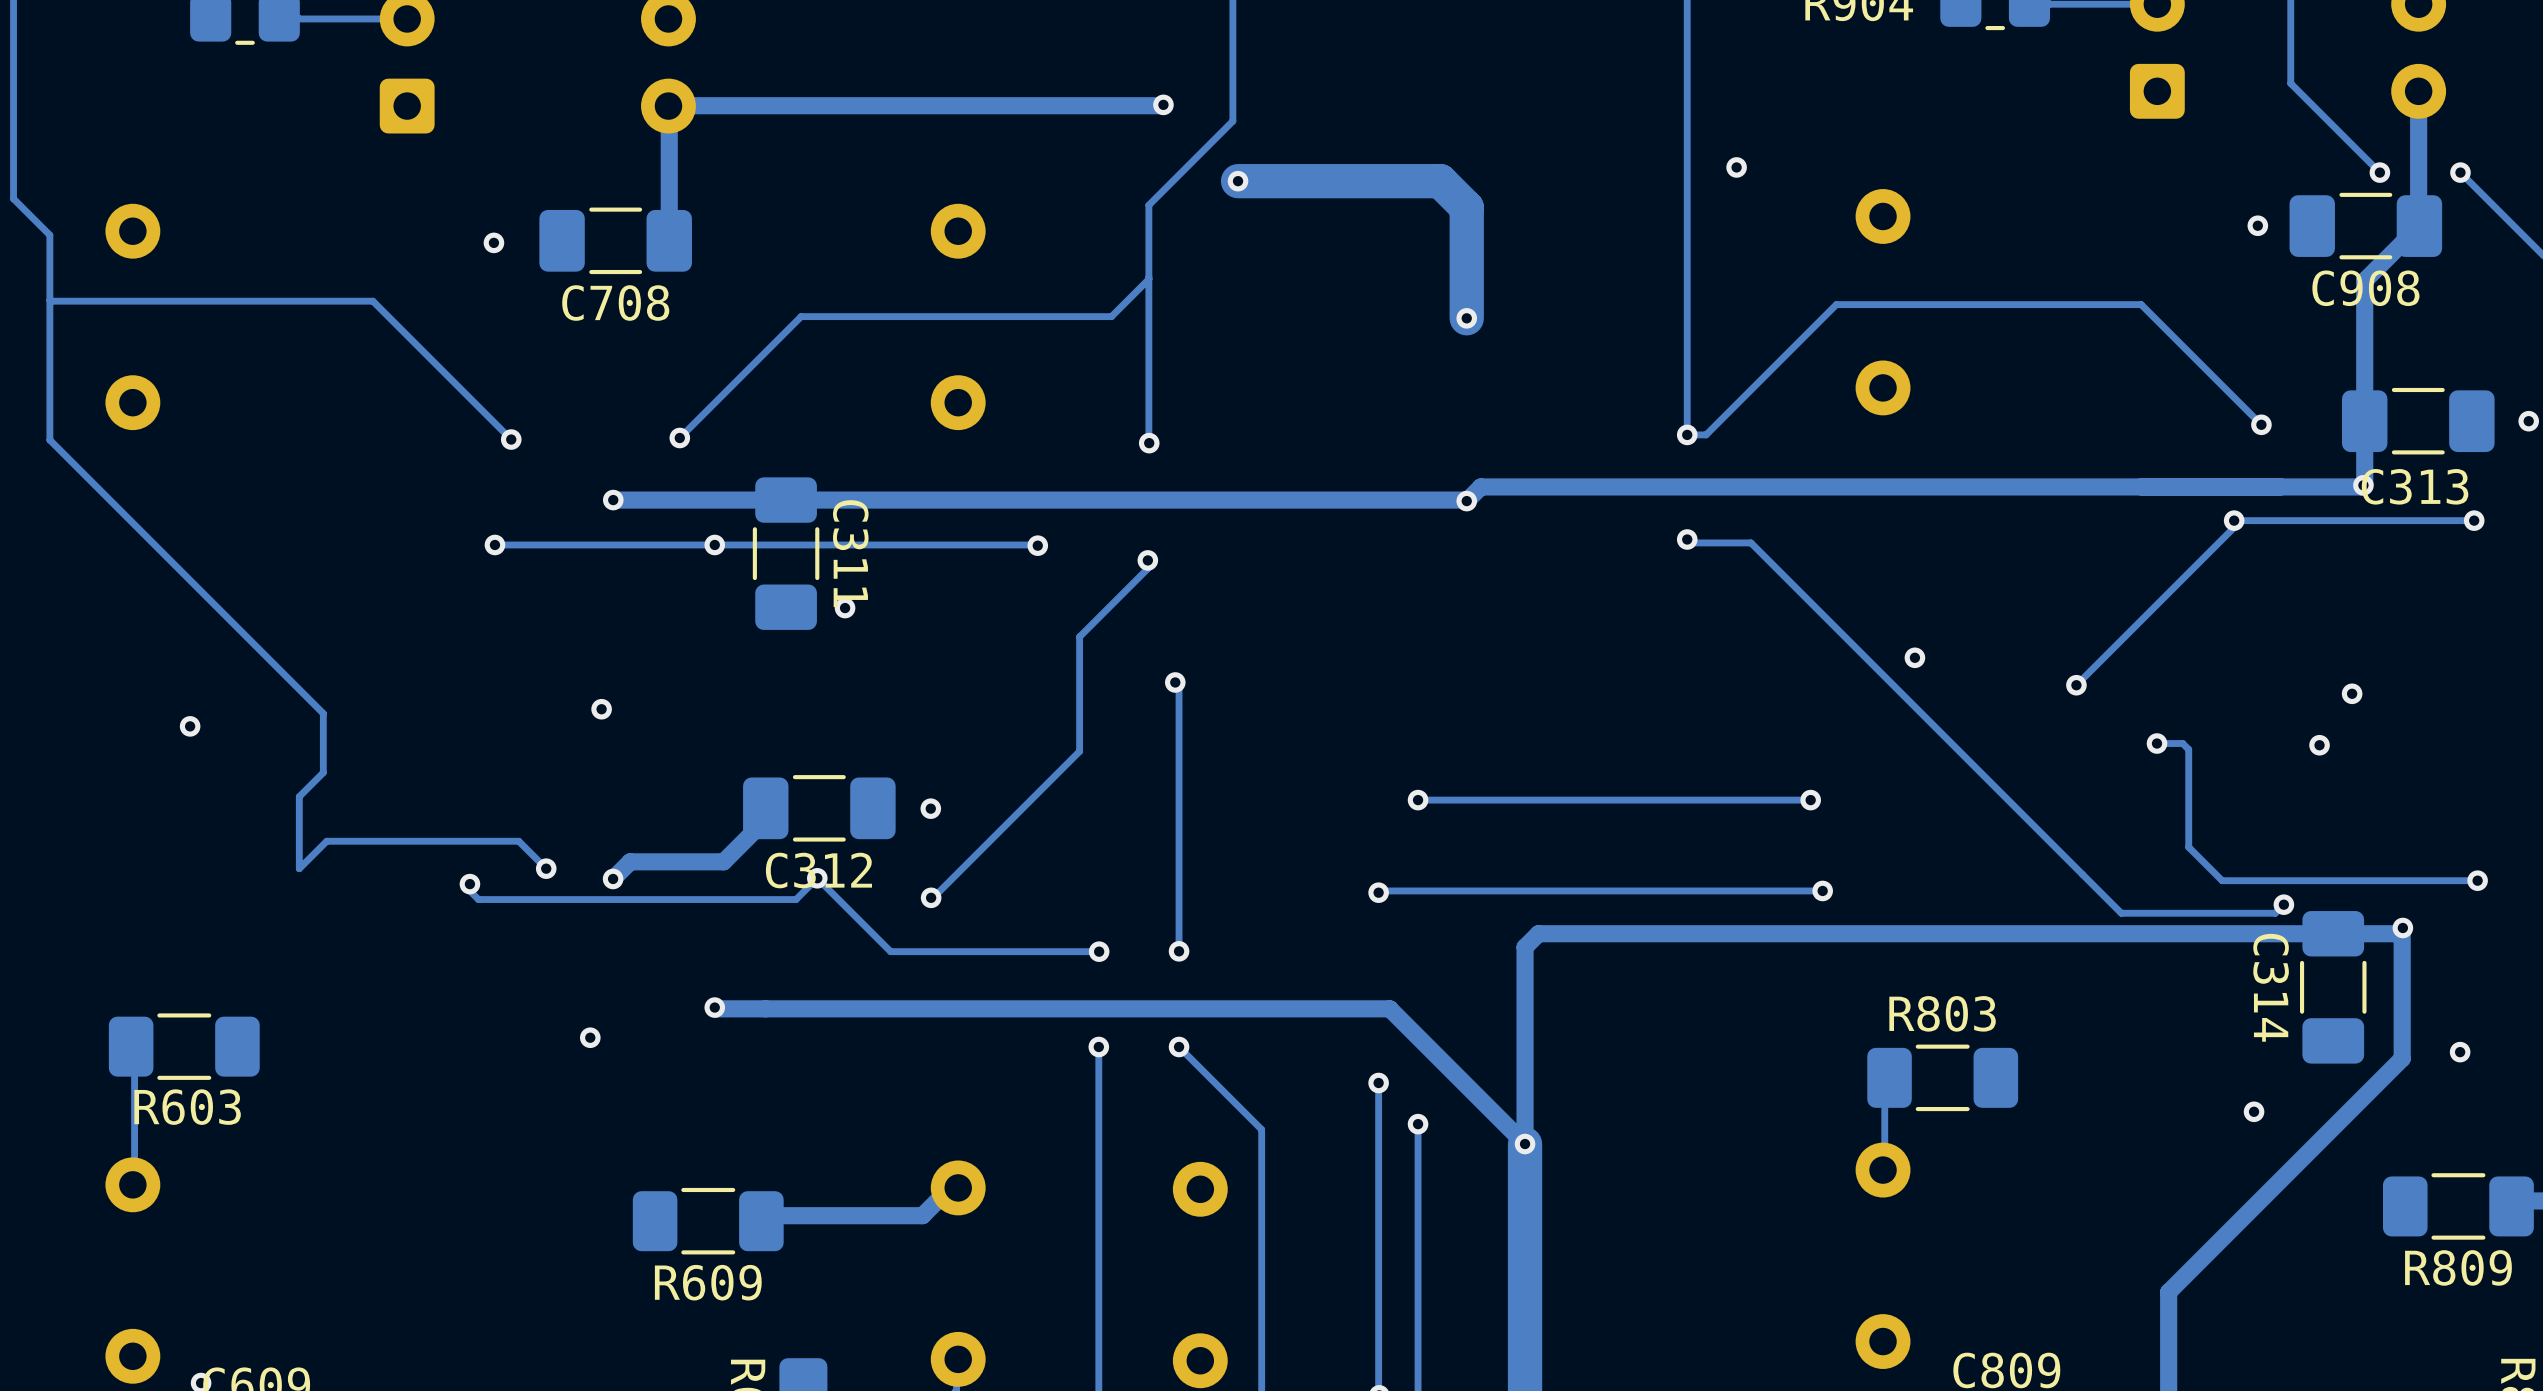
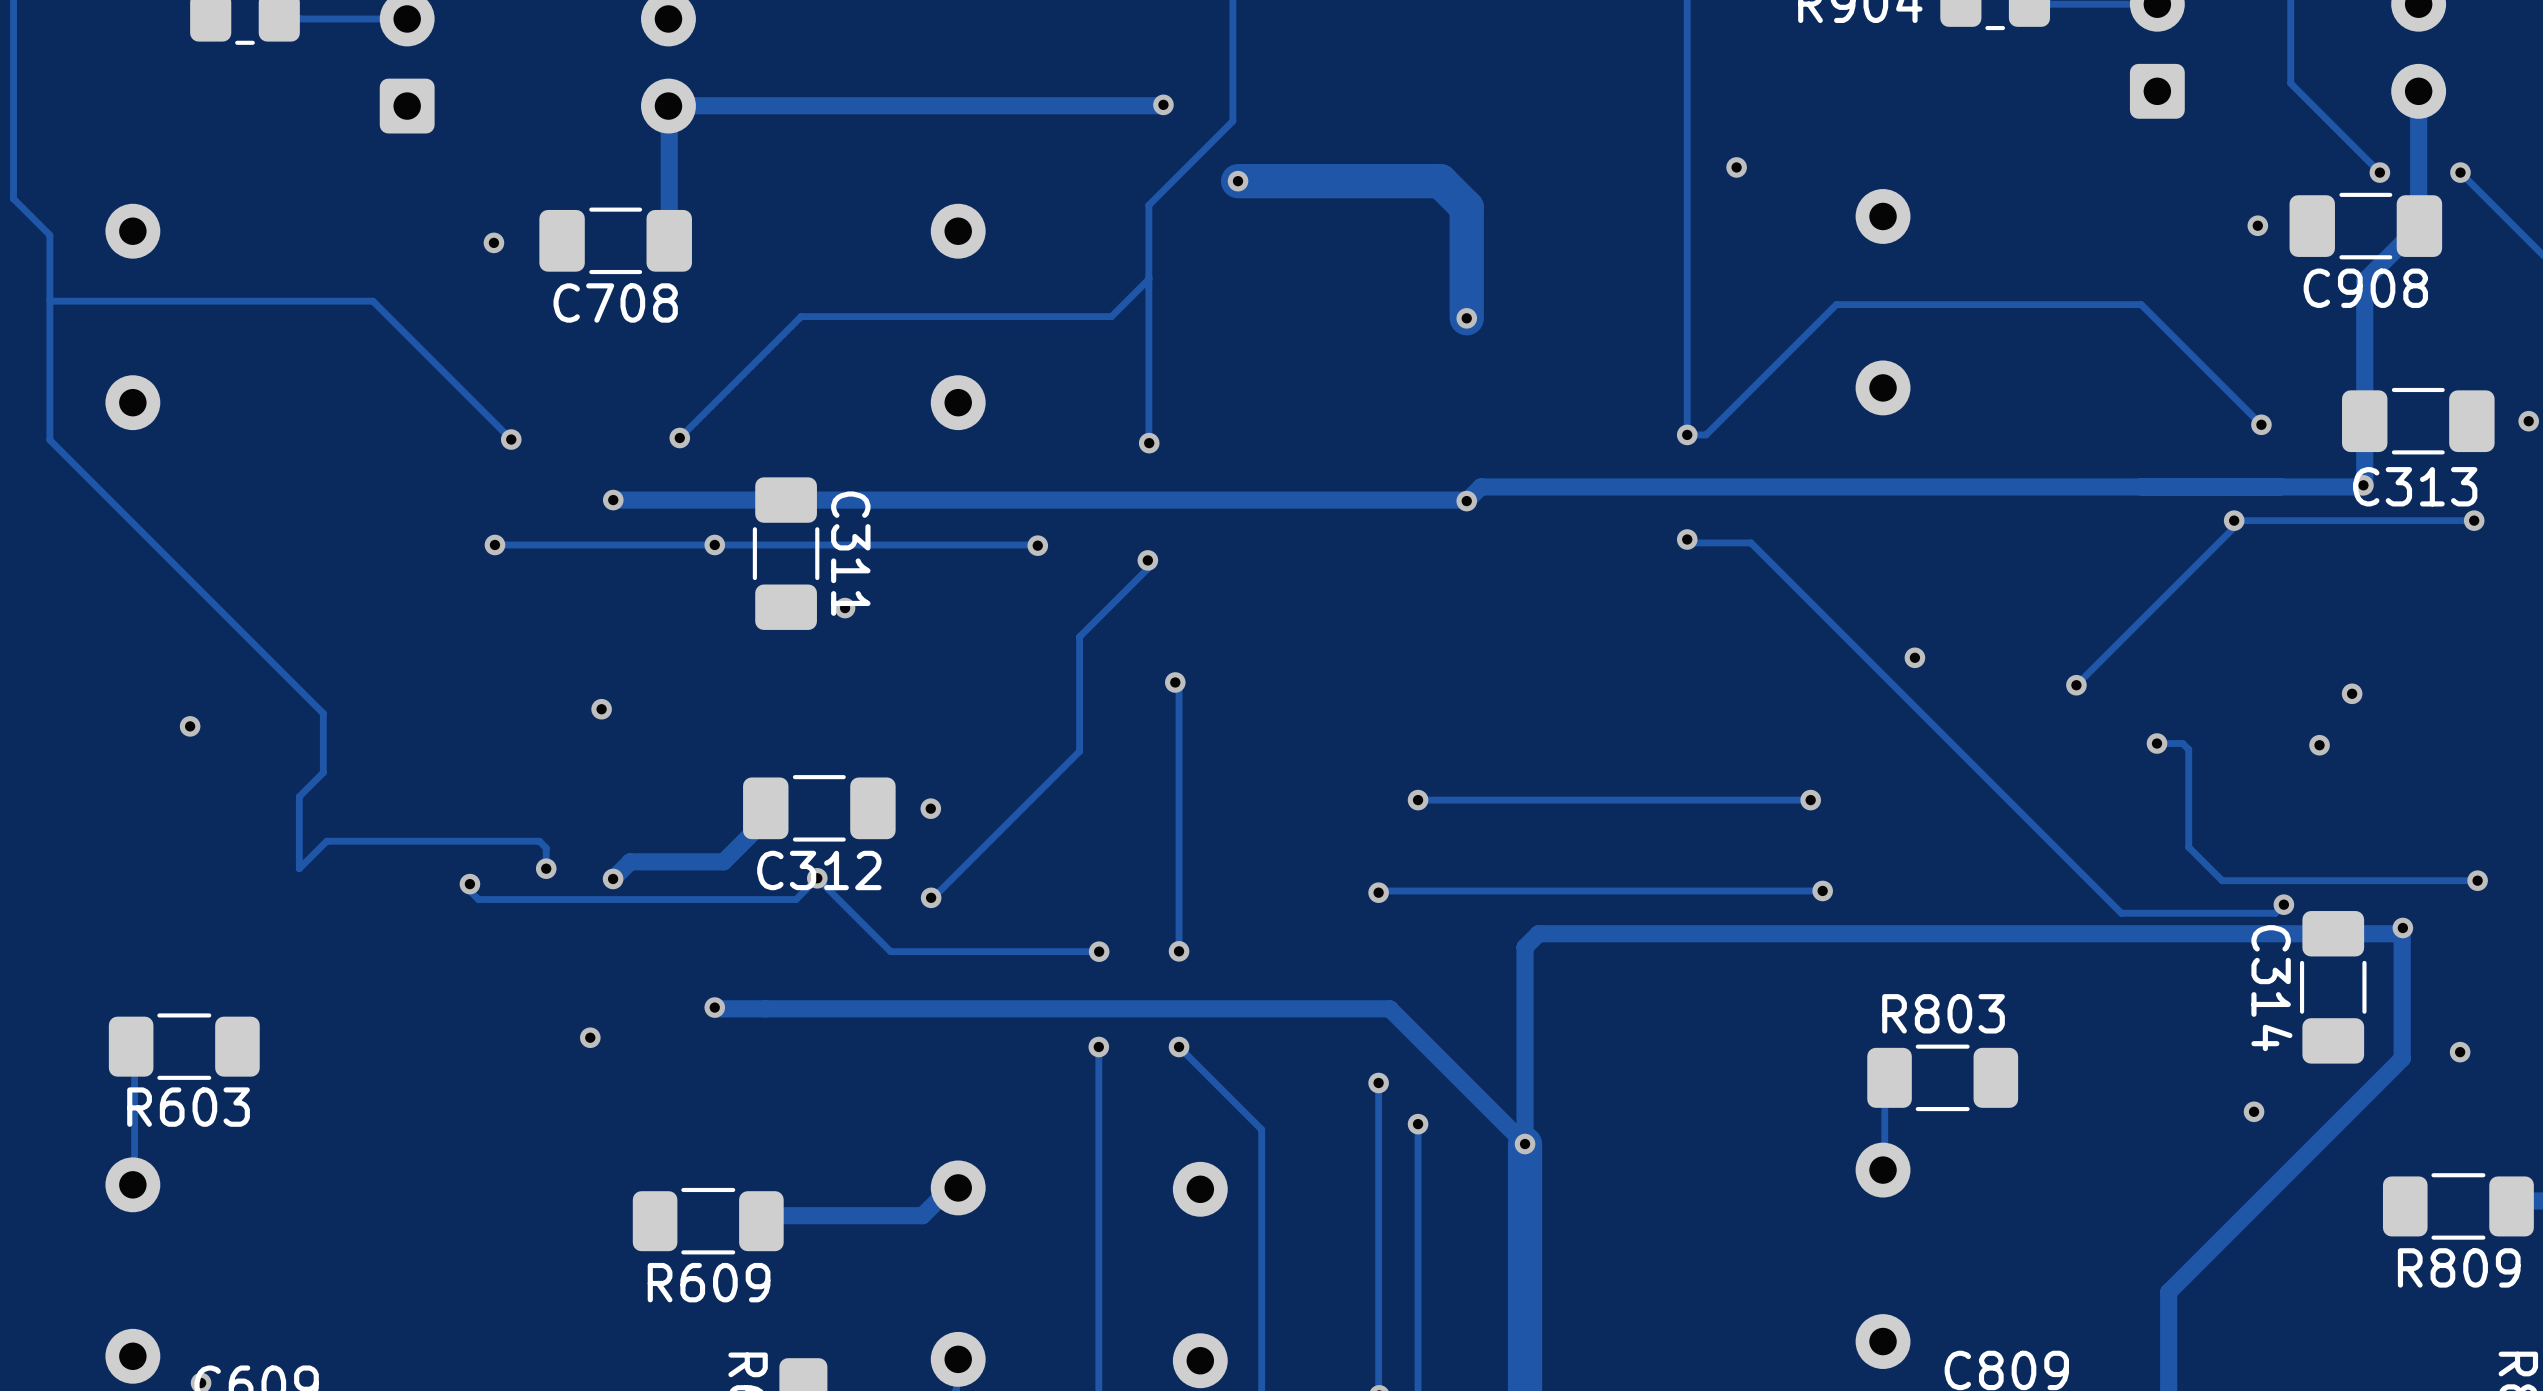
track: (518, 841) (546, 868) -> (518, 841) (539, 841) (546, 848) (546, 868)

